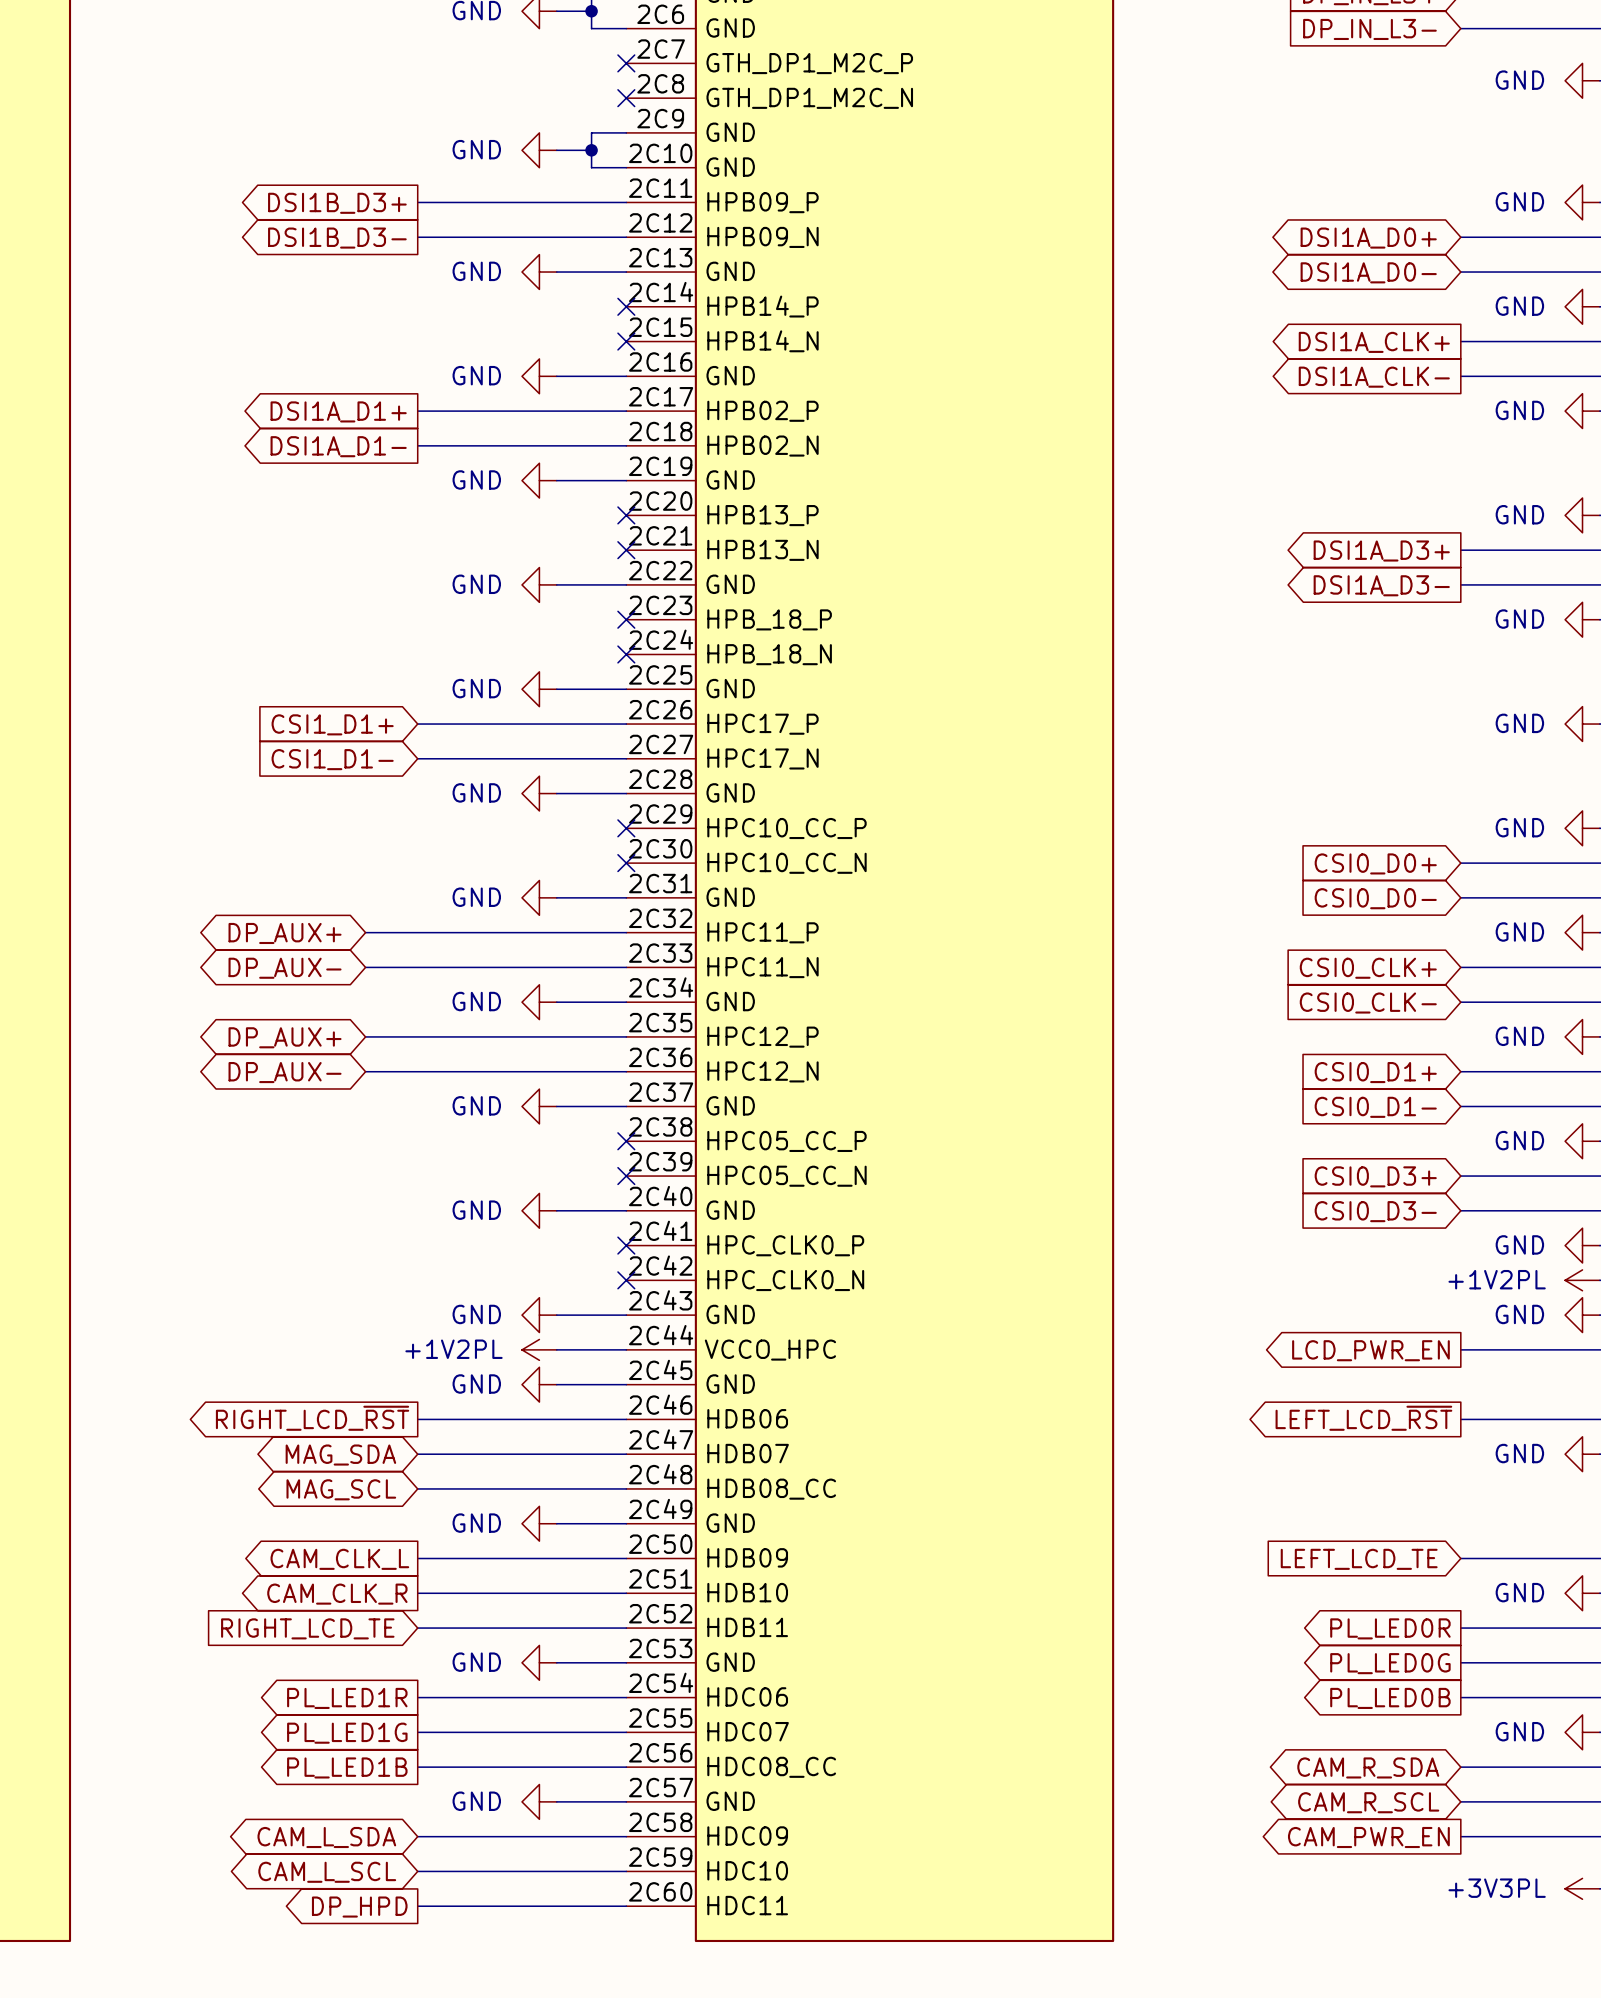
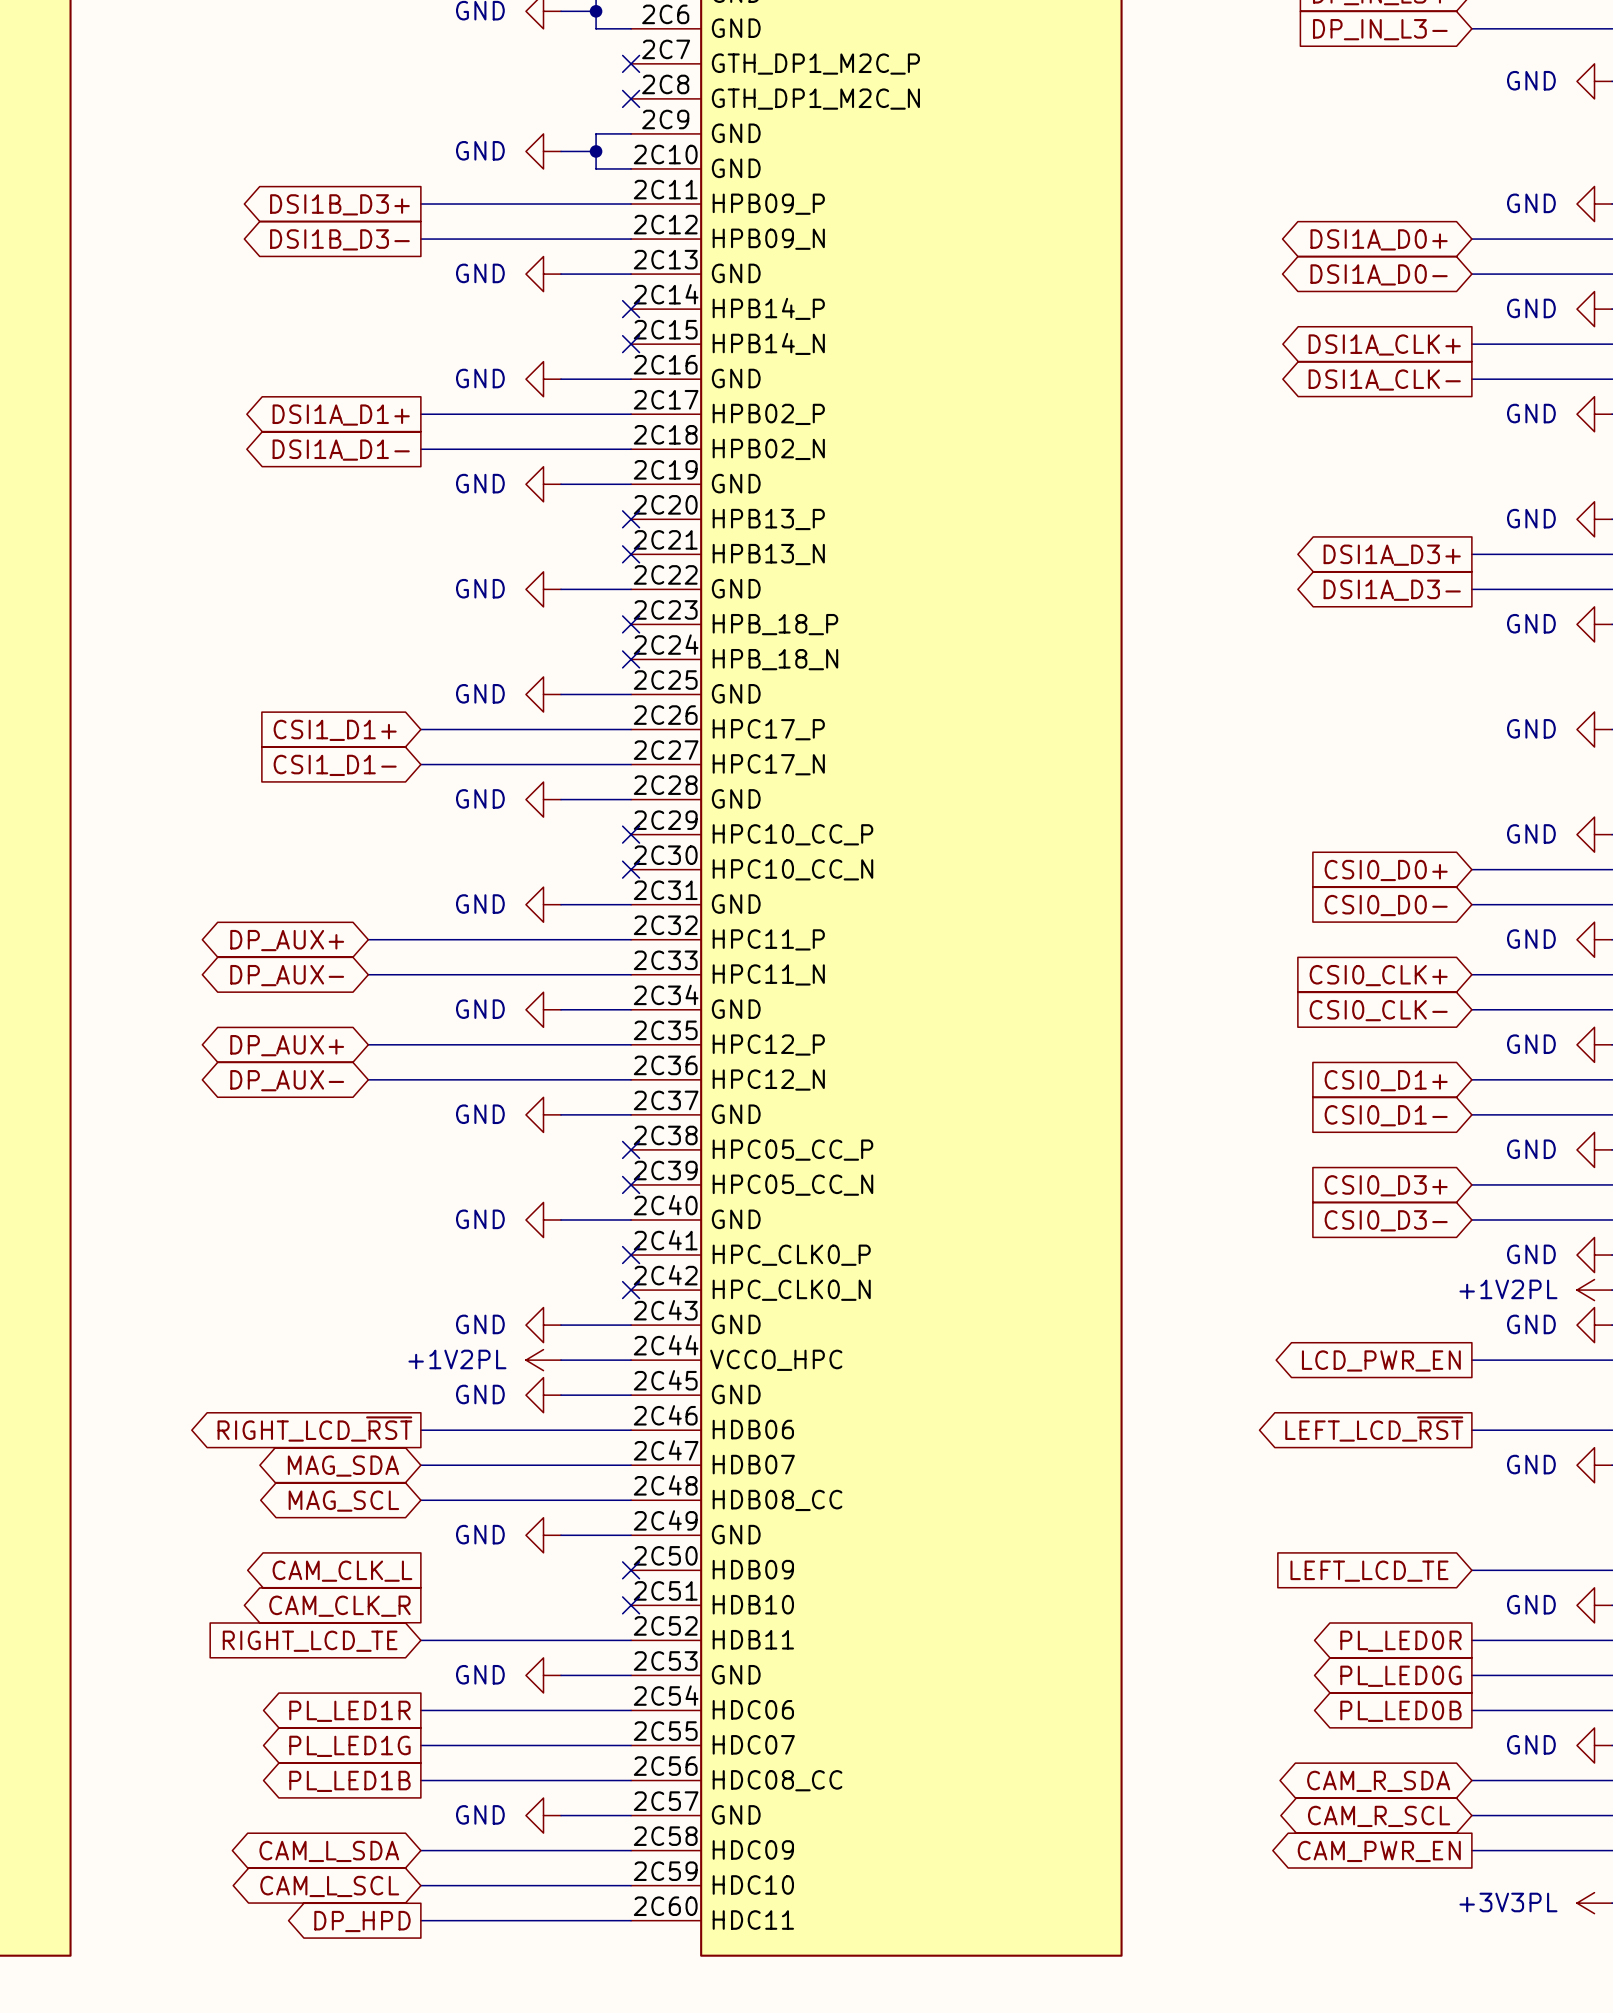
wire: (417, 1558) (626, 1558) -> none
no-connect mark: none -> (631, 1570)
wire: (417, 1593) (626, 1593) -> none
no-connect mark: none -> (631, 1605)

